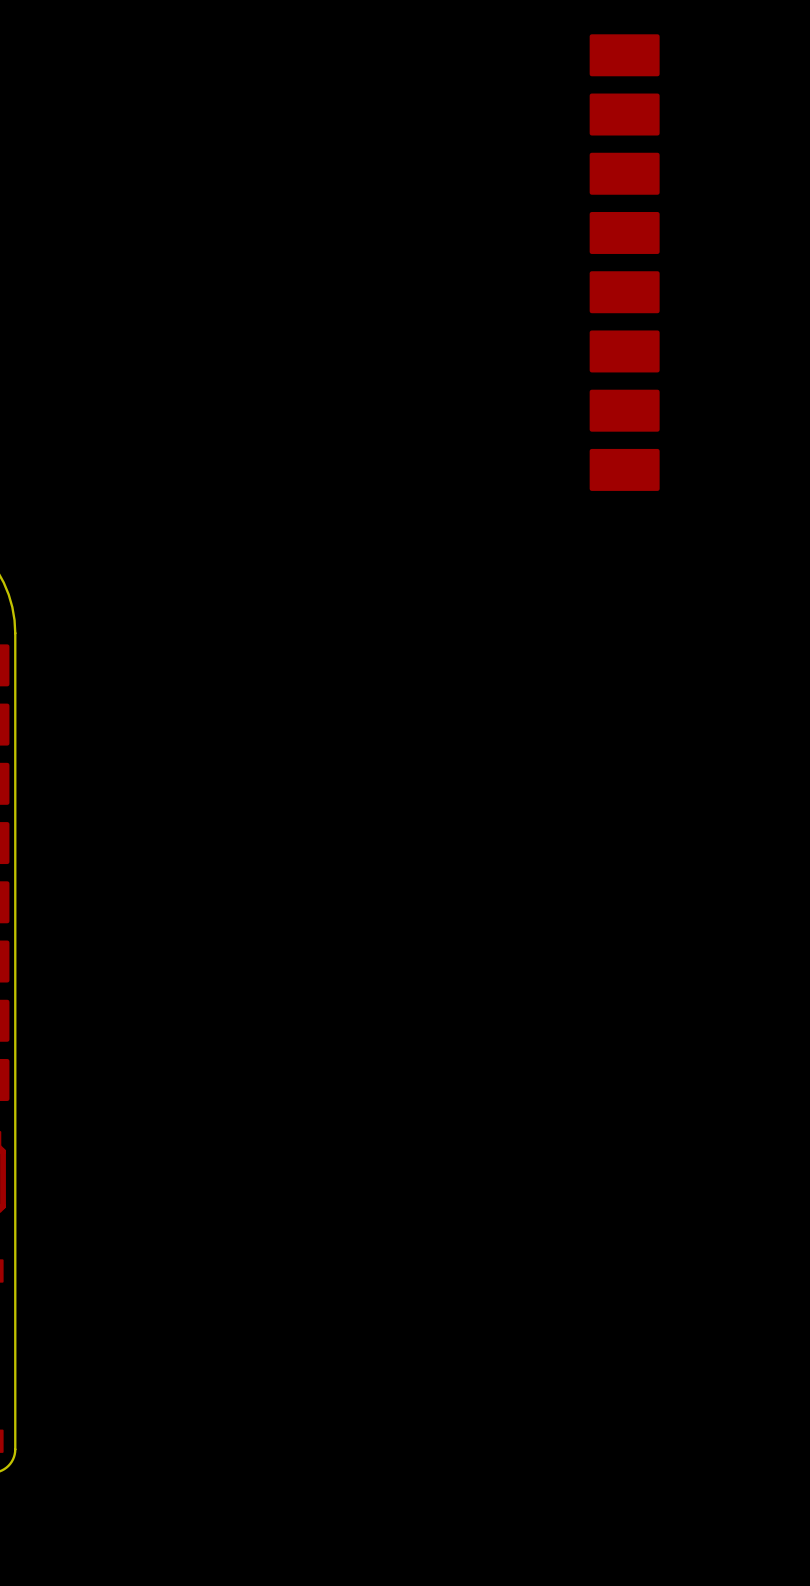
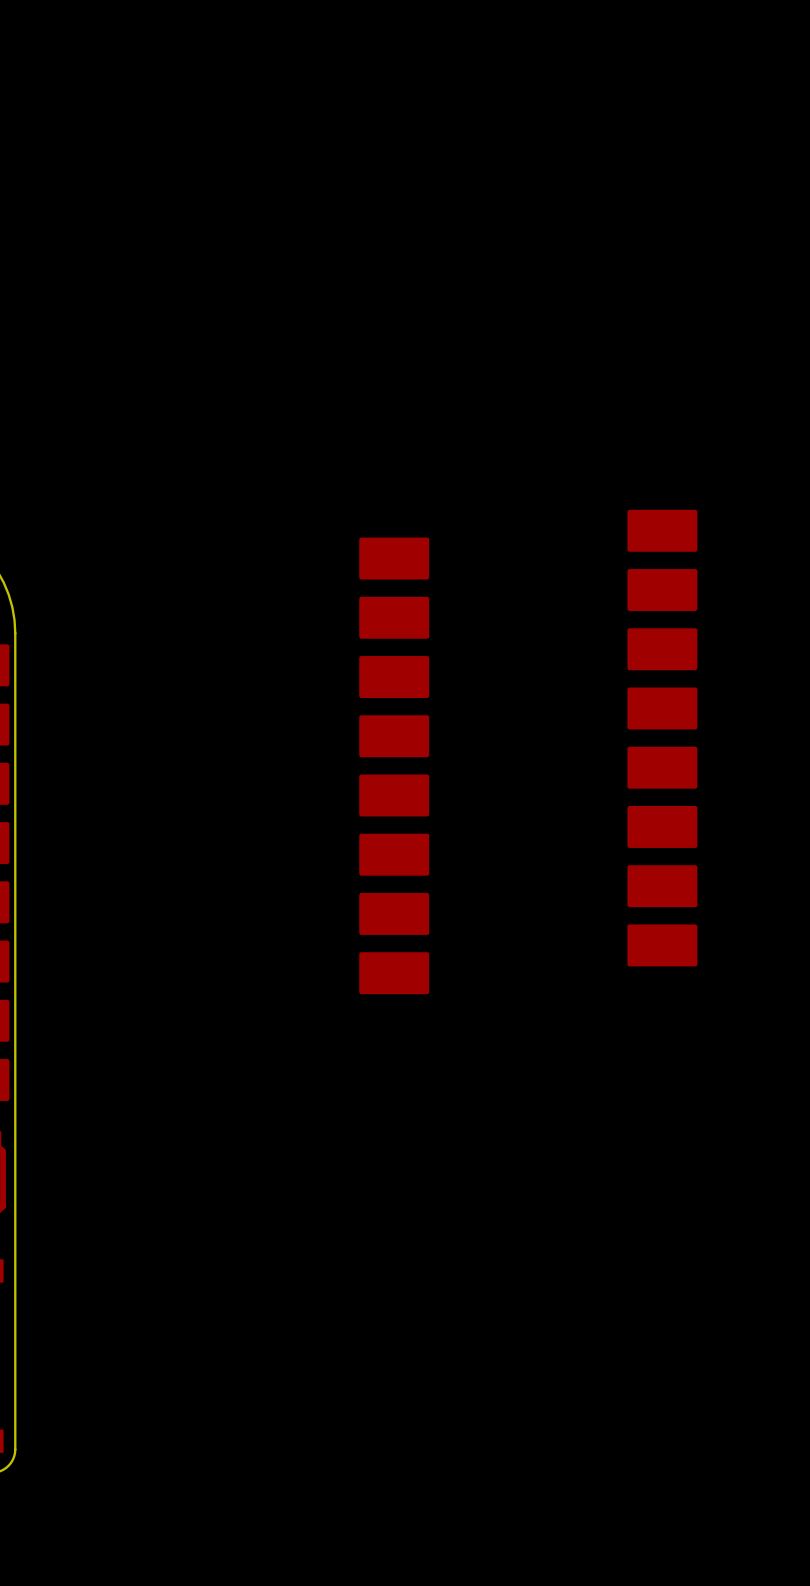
part: (624, 262) -> none
part: none -> (662, 738)
part: none -> (394, 765)

